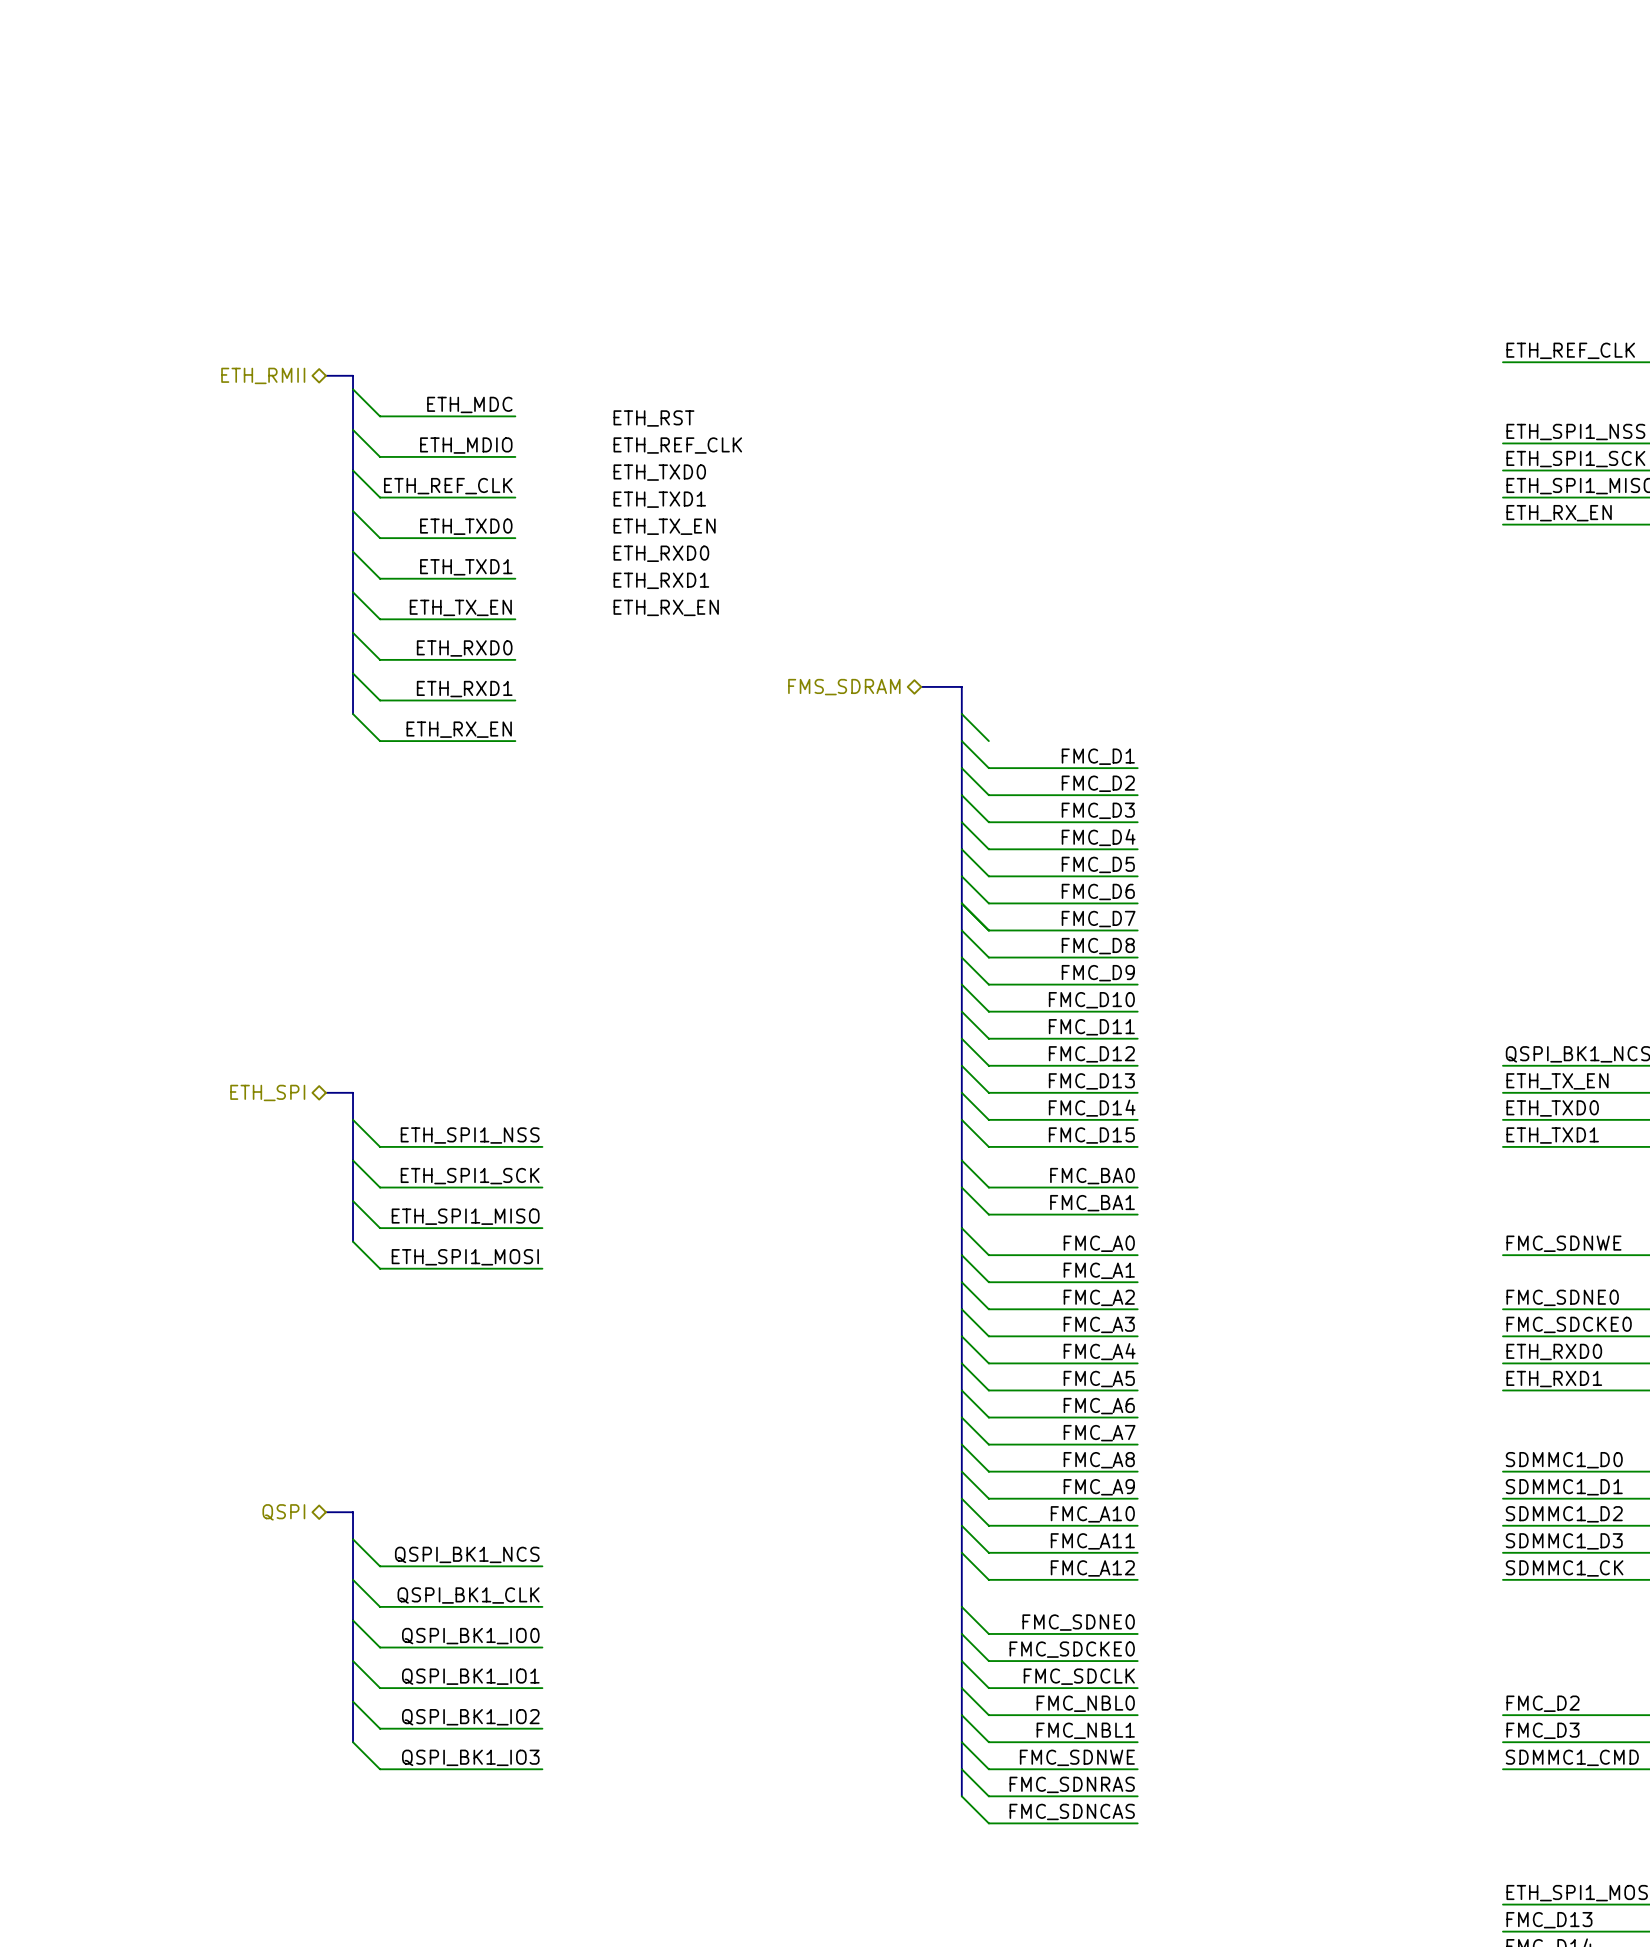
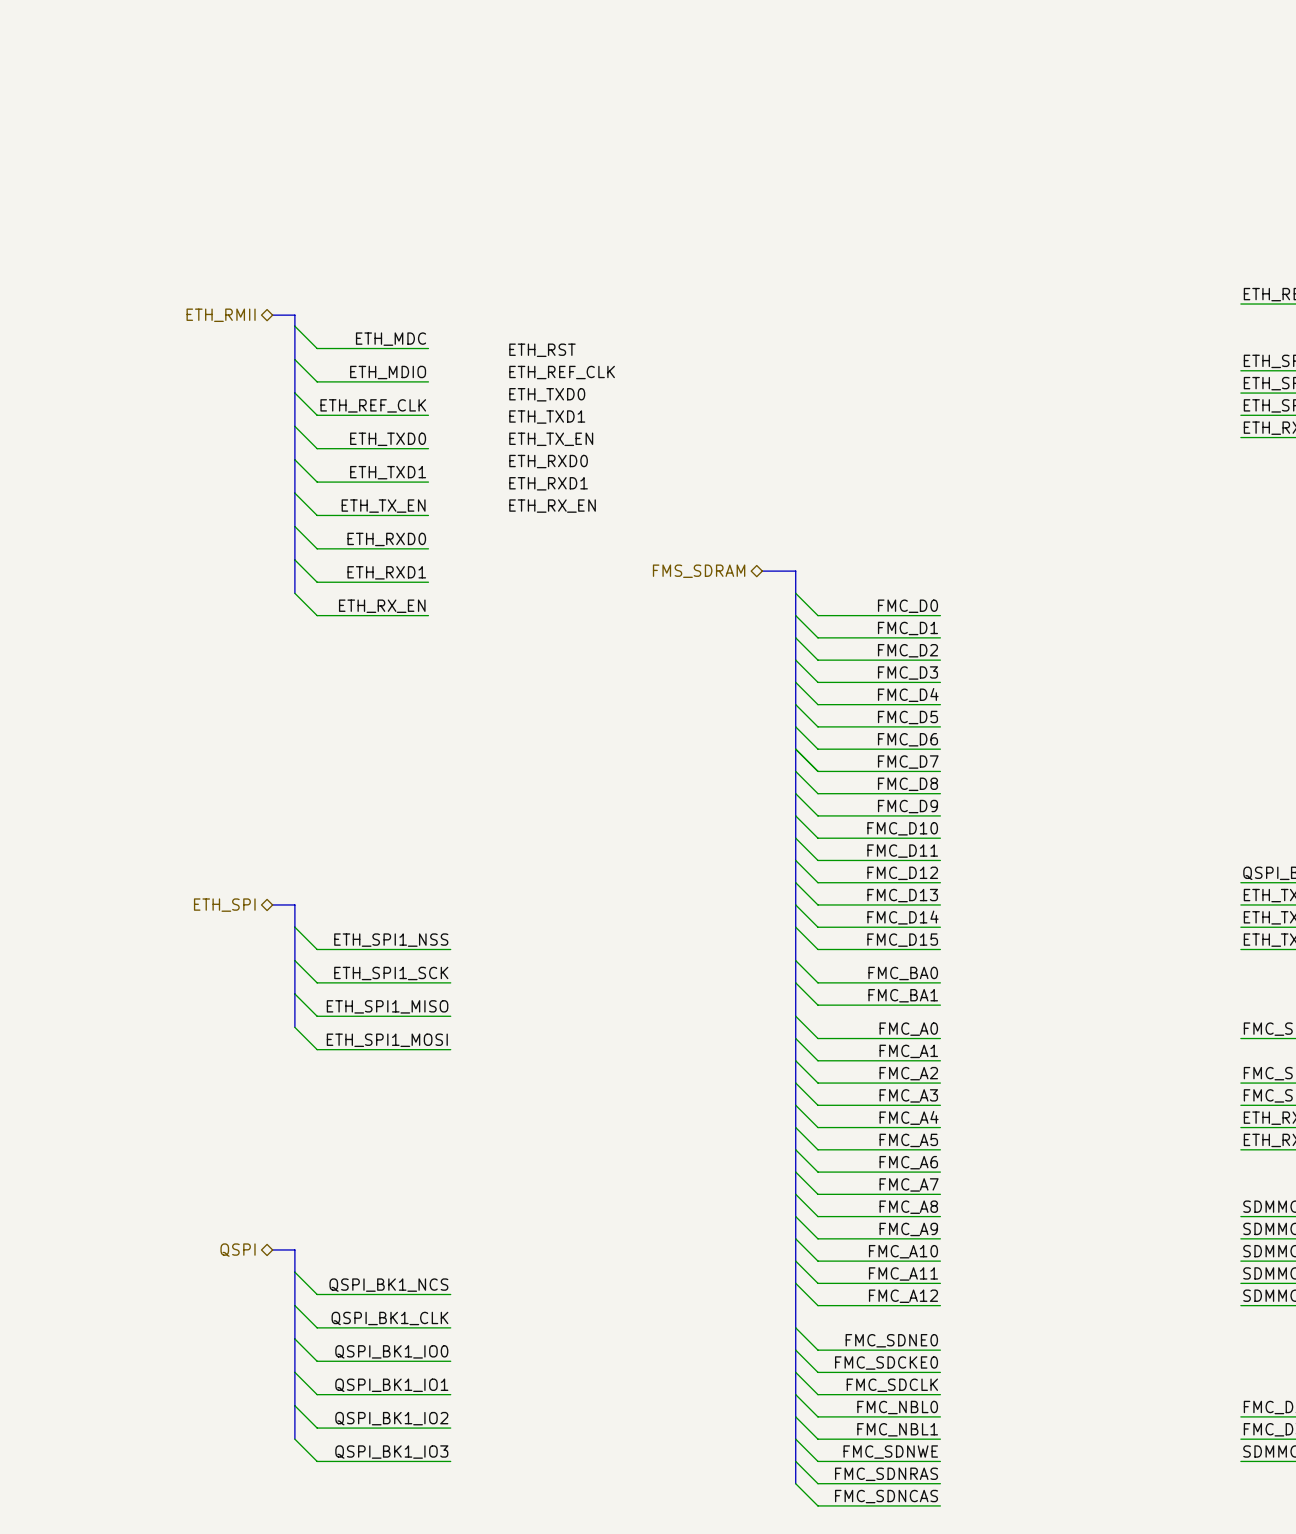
label: none -> FMC_D0 (907, 606)
wire: none -> (817, 615) (940, 615)

